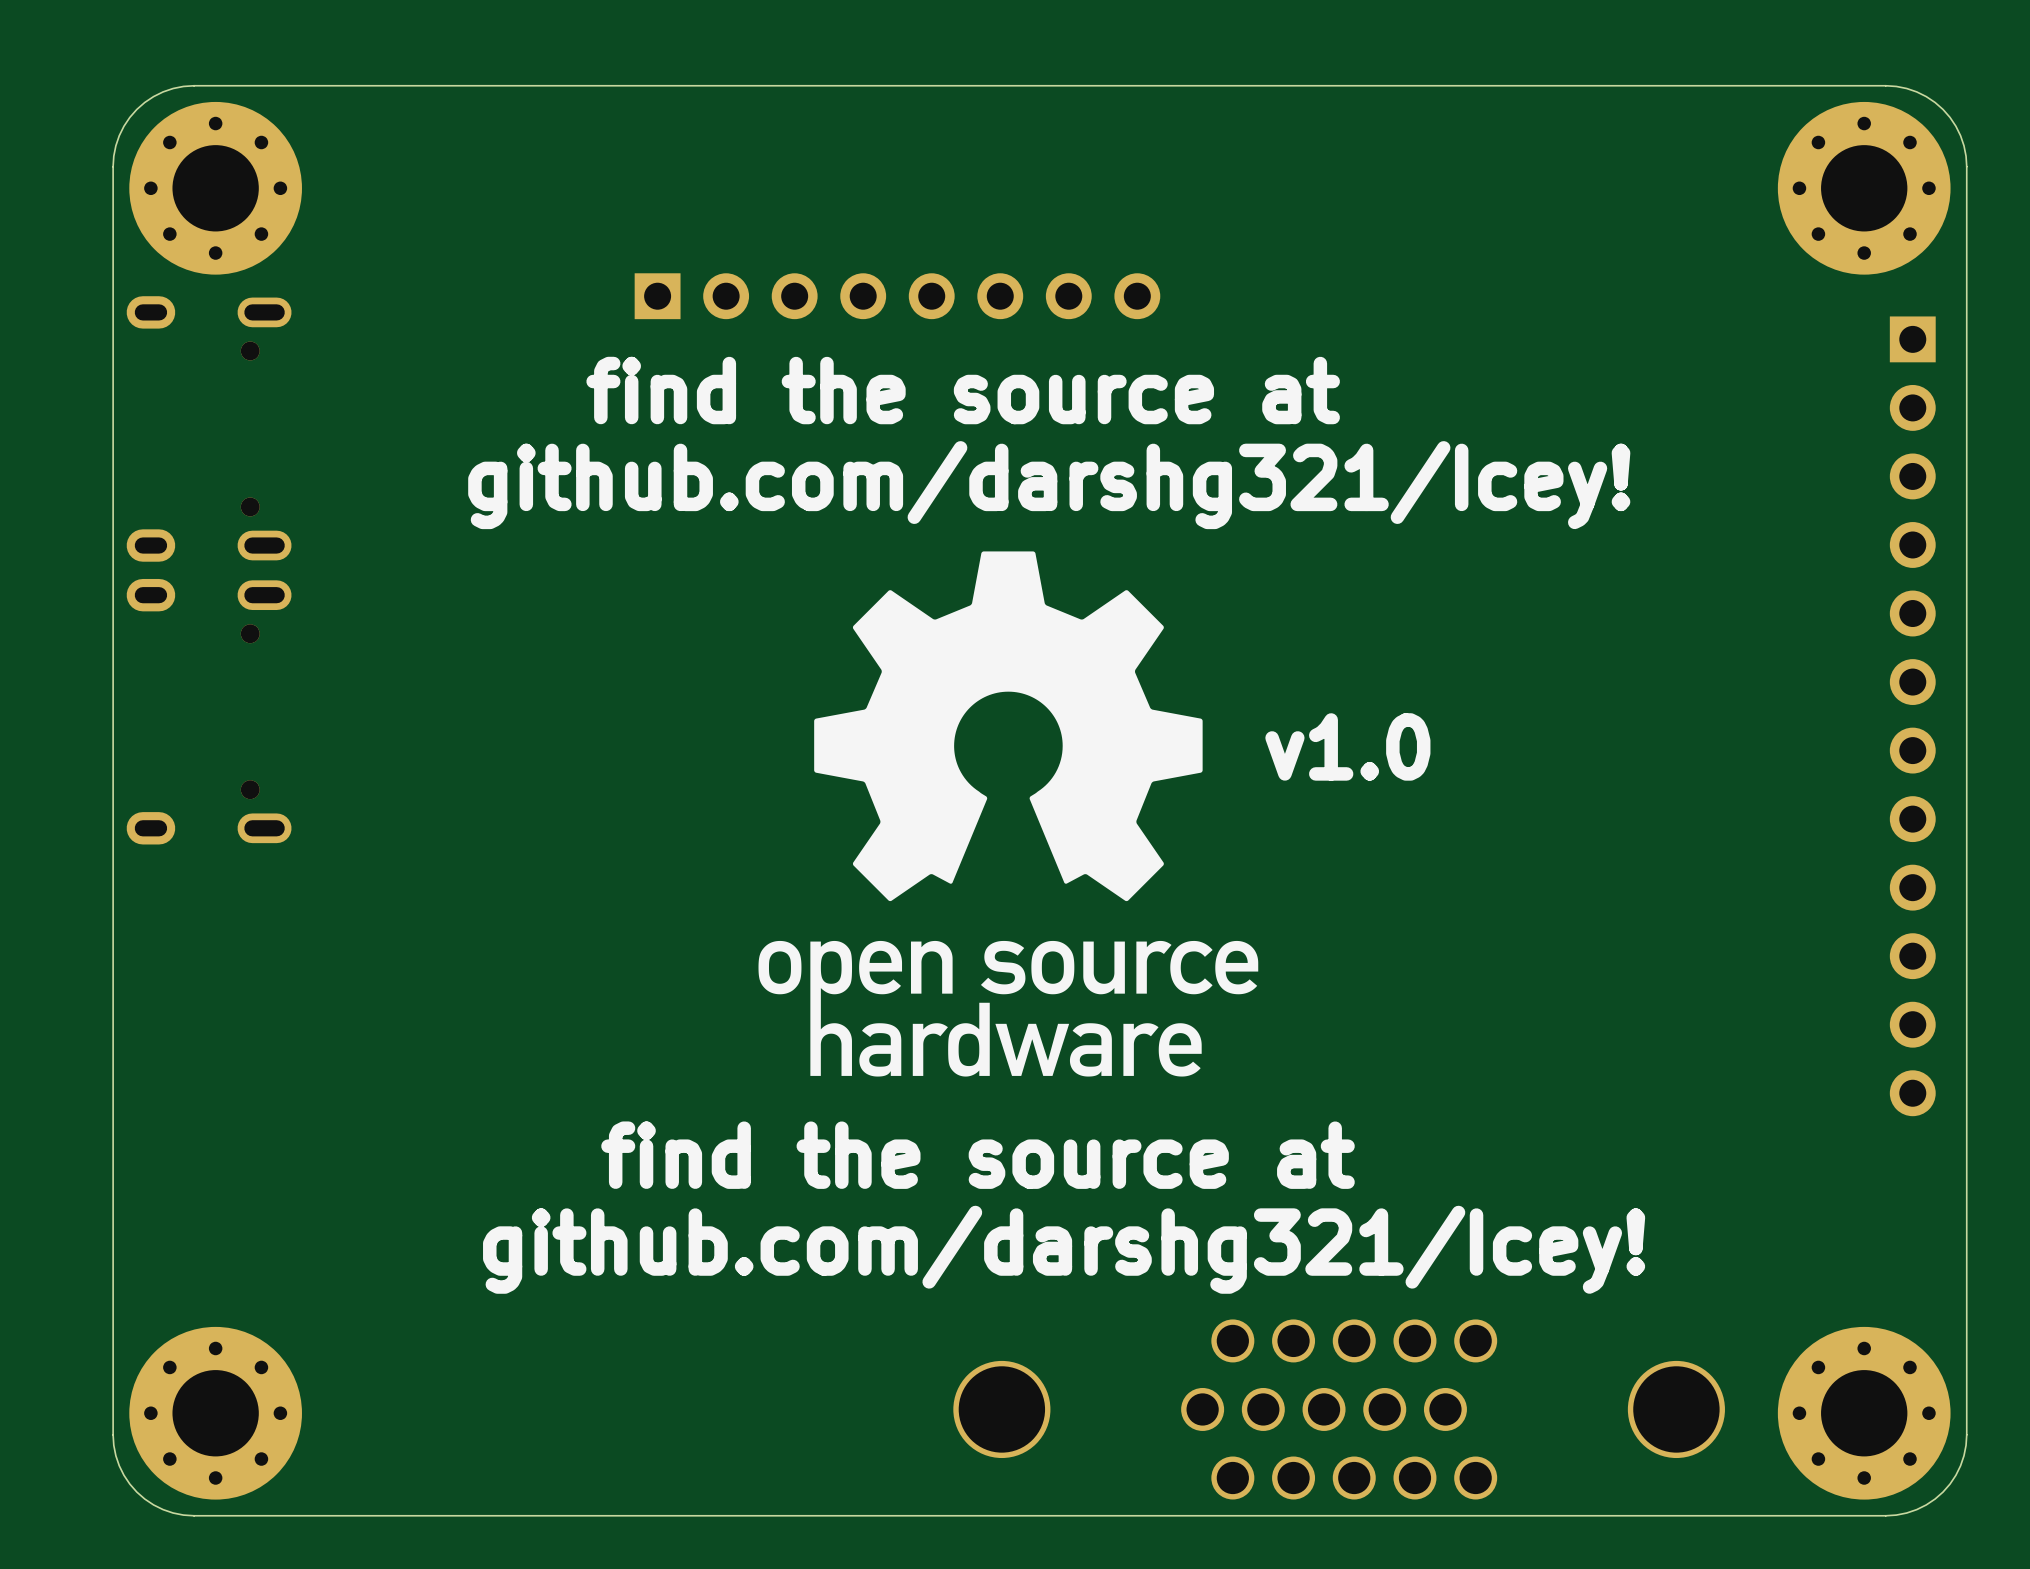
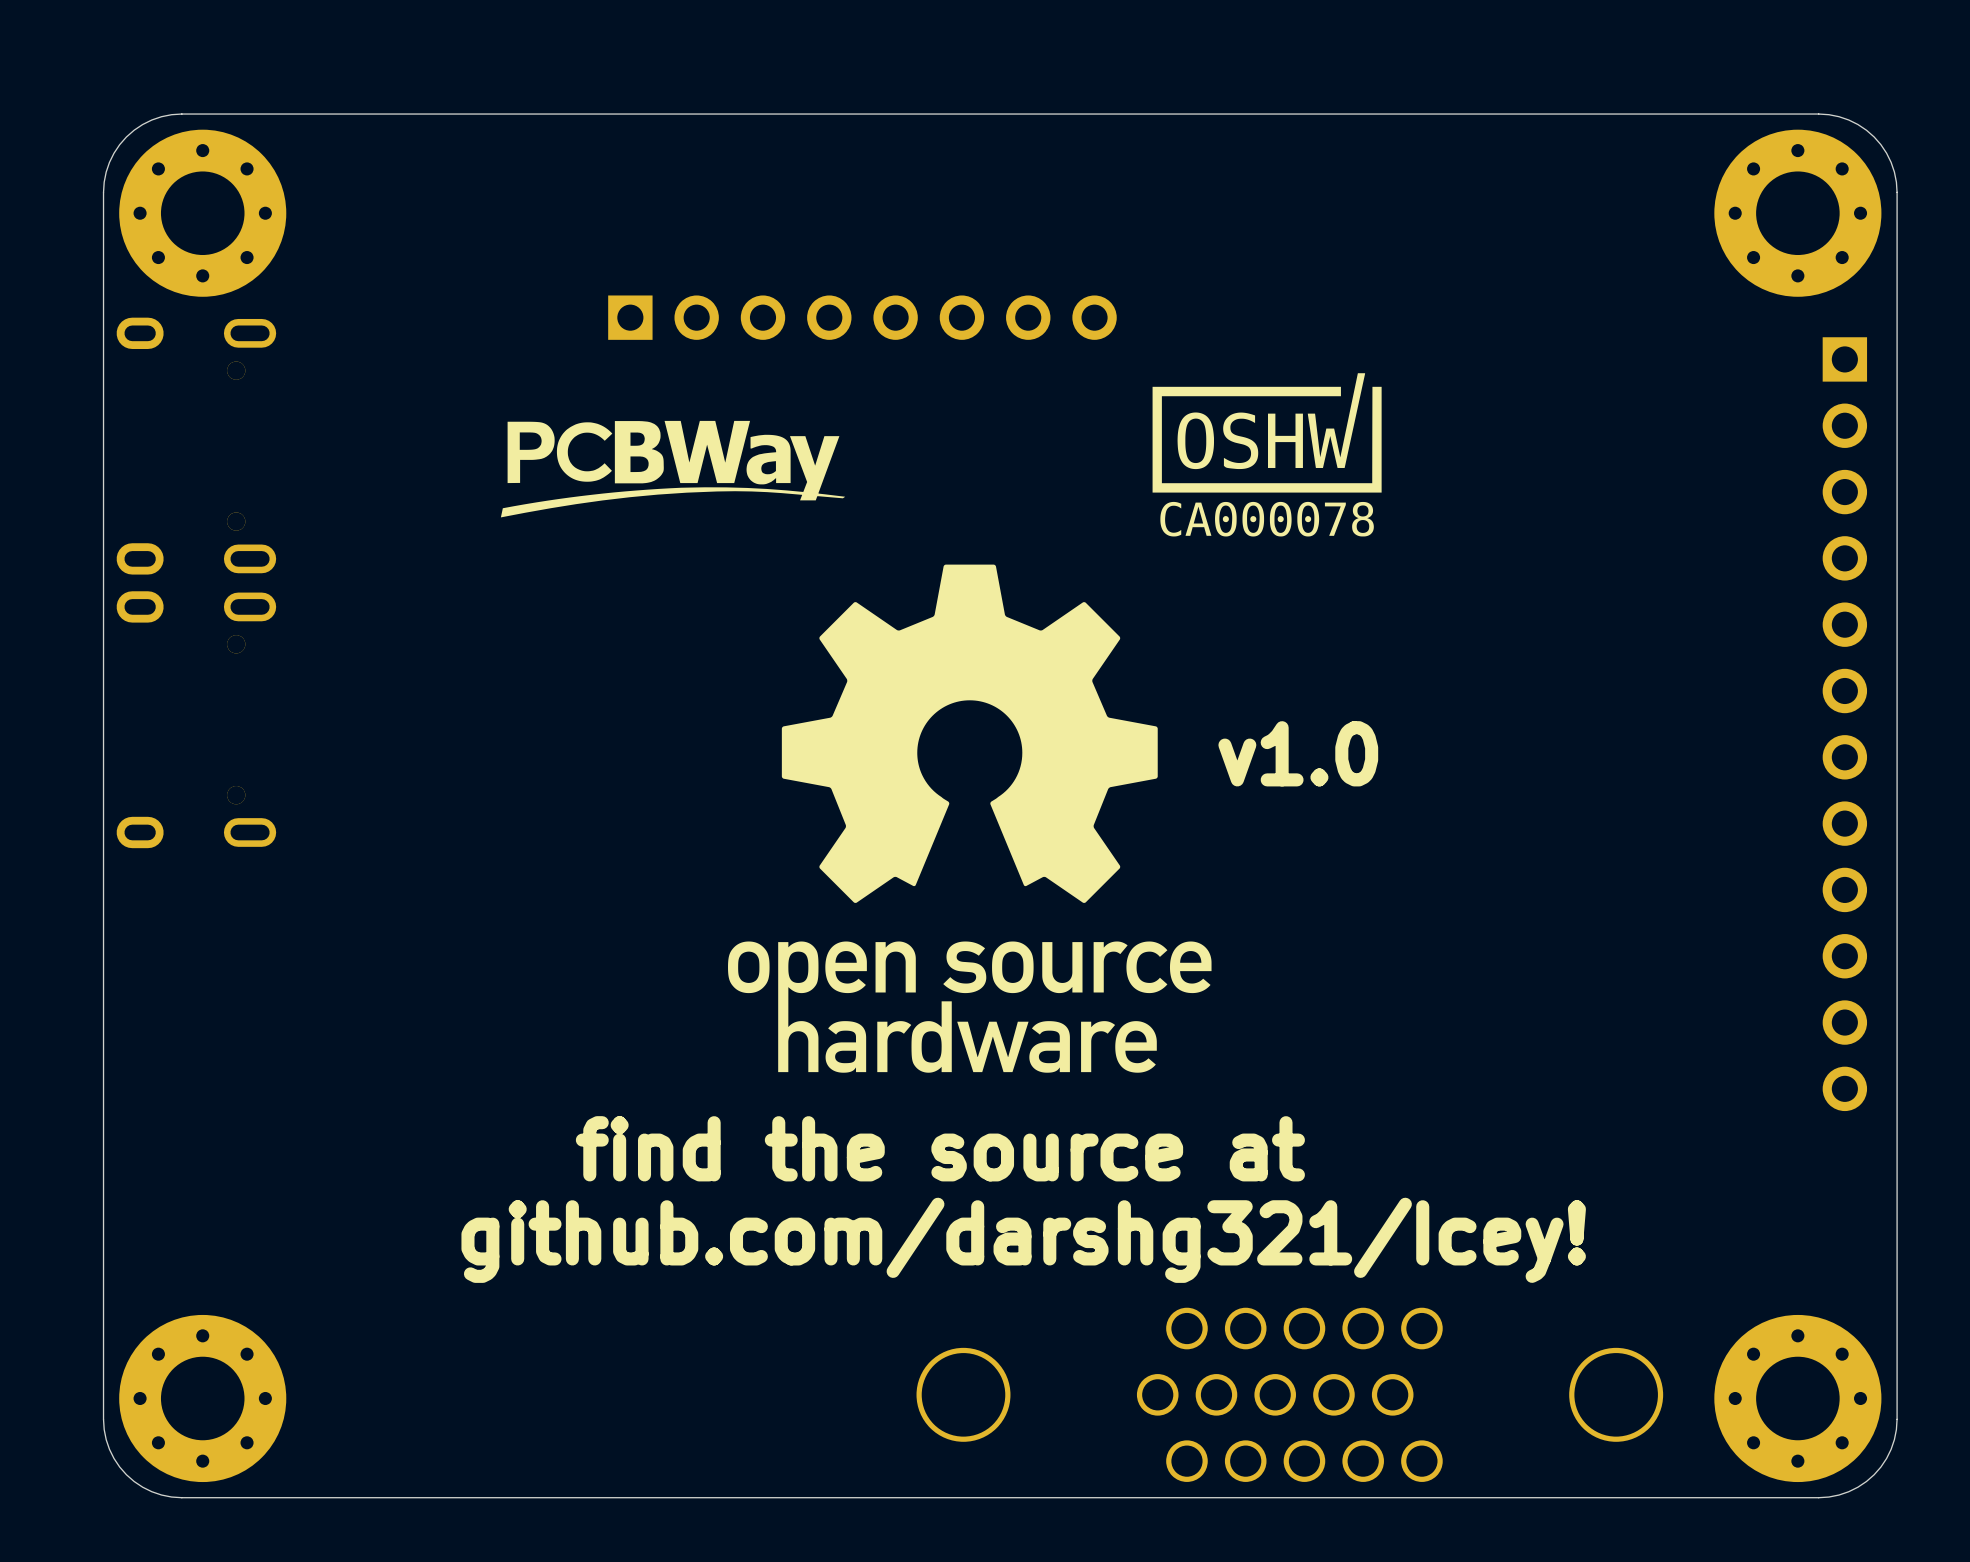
drawing: none -> [1152, 373, 1382, 537]
text: find the source at (963, 390) -> none
drawing: none -> [500, 420, 846, 518]
text: github.com/darshg321/Icey! (1049, 485) -> none

